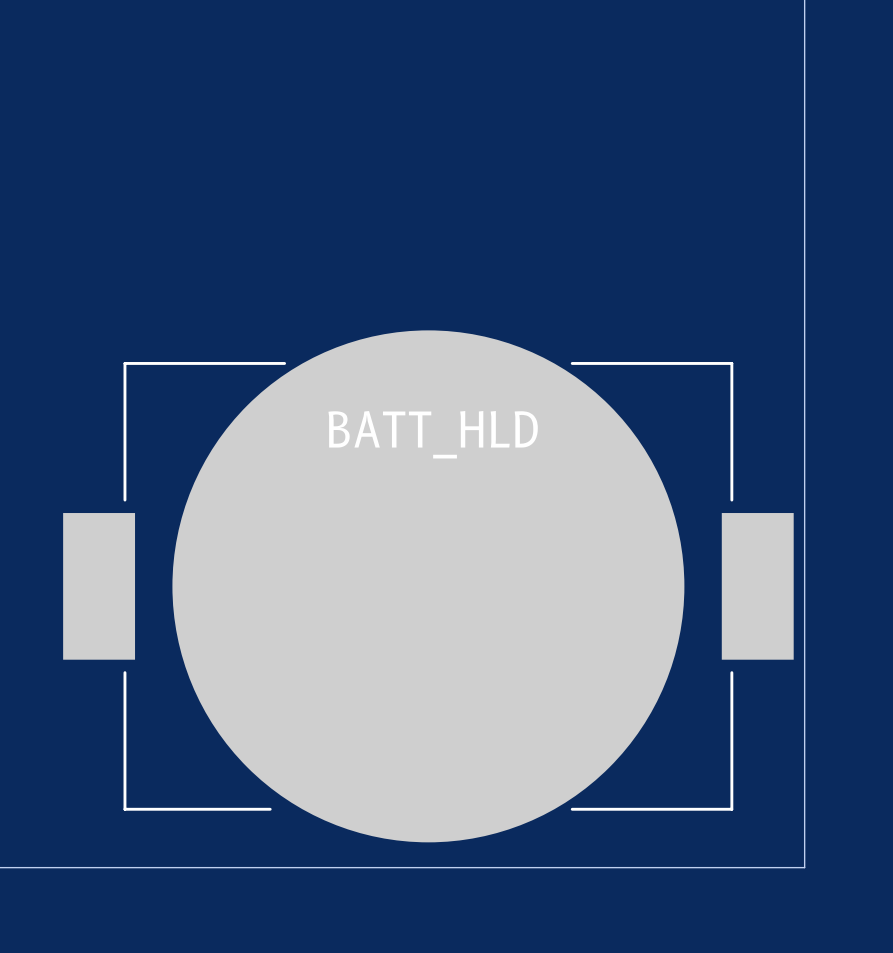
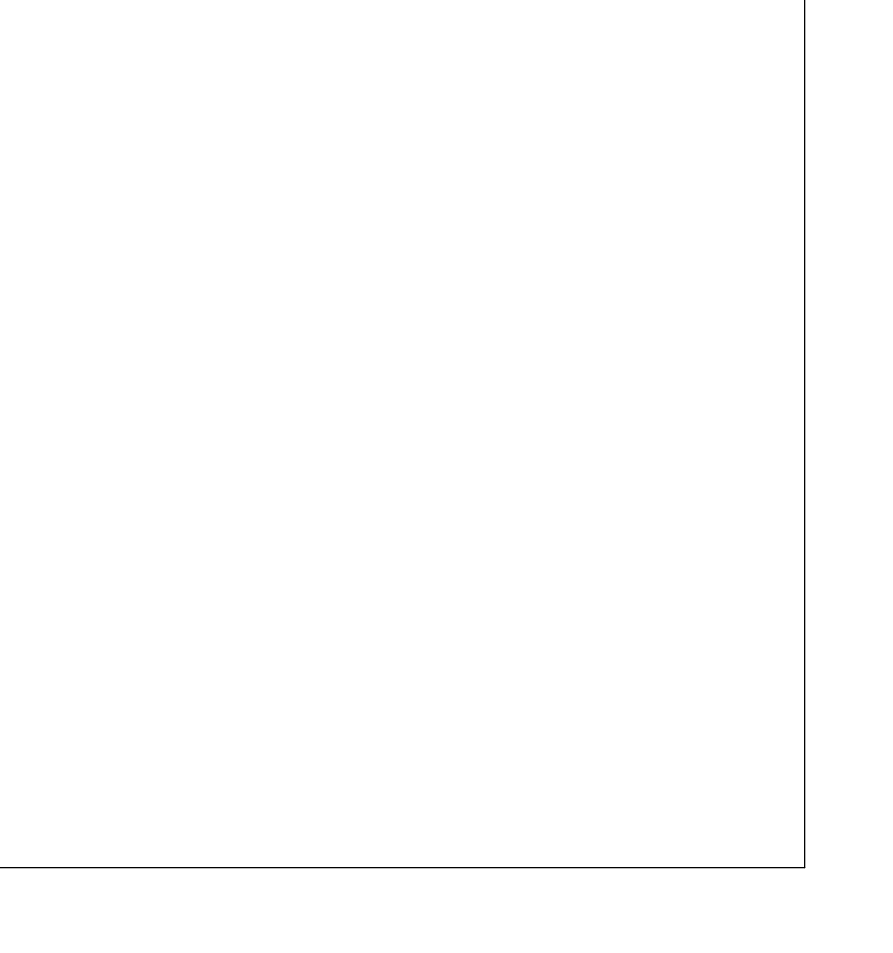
part: (428, 586) -> none

